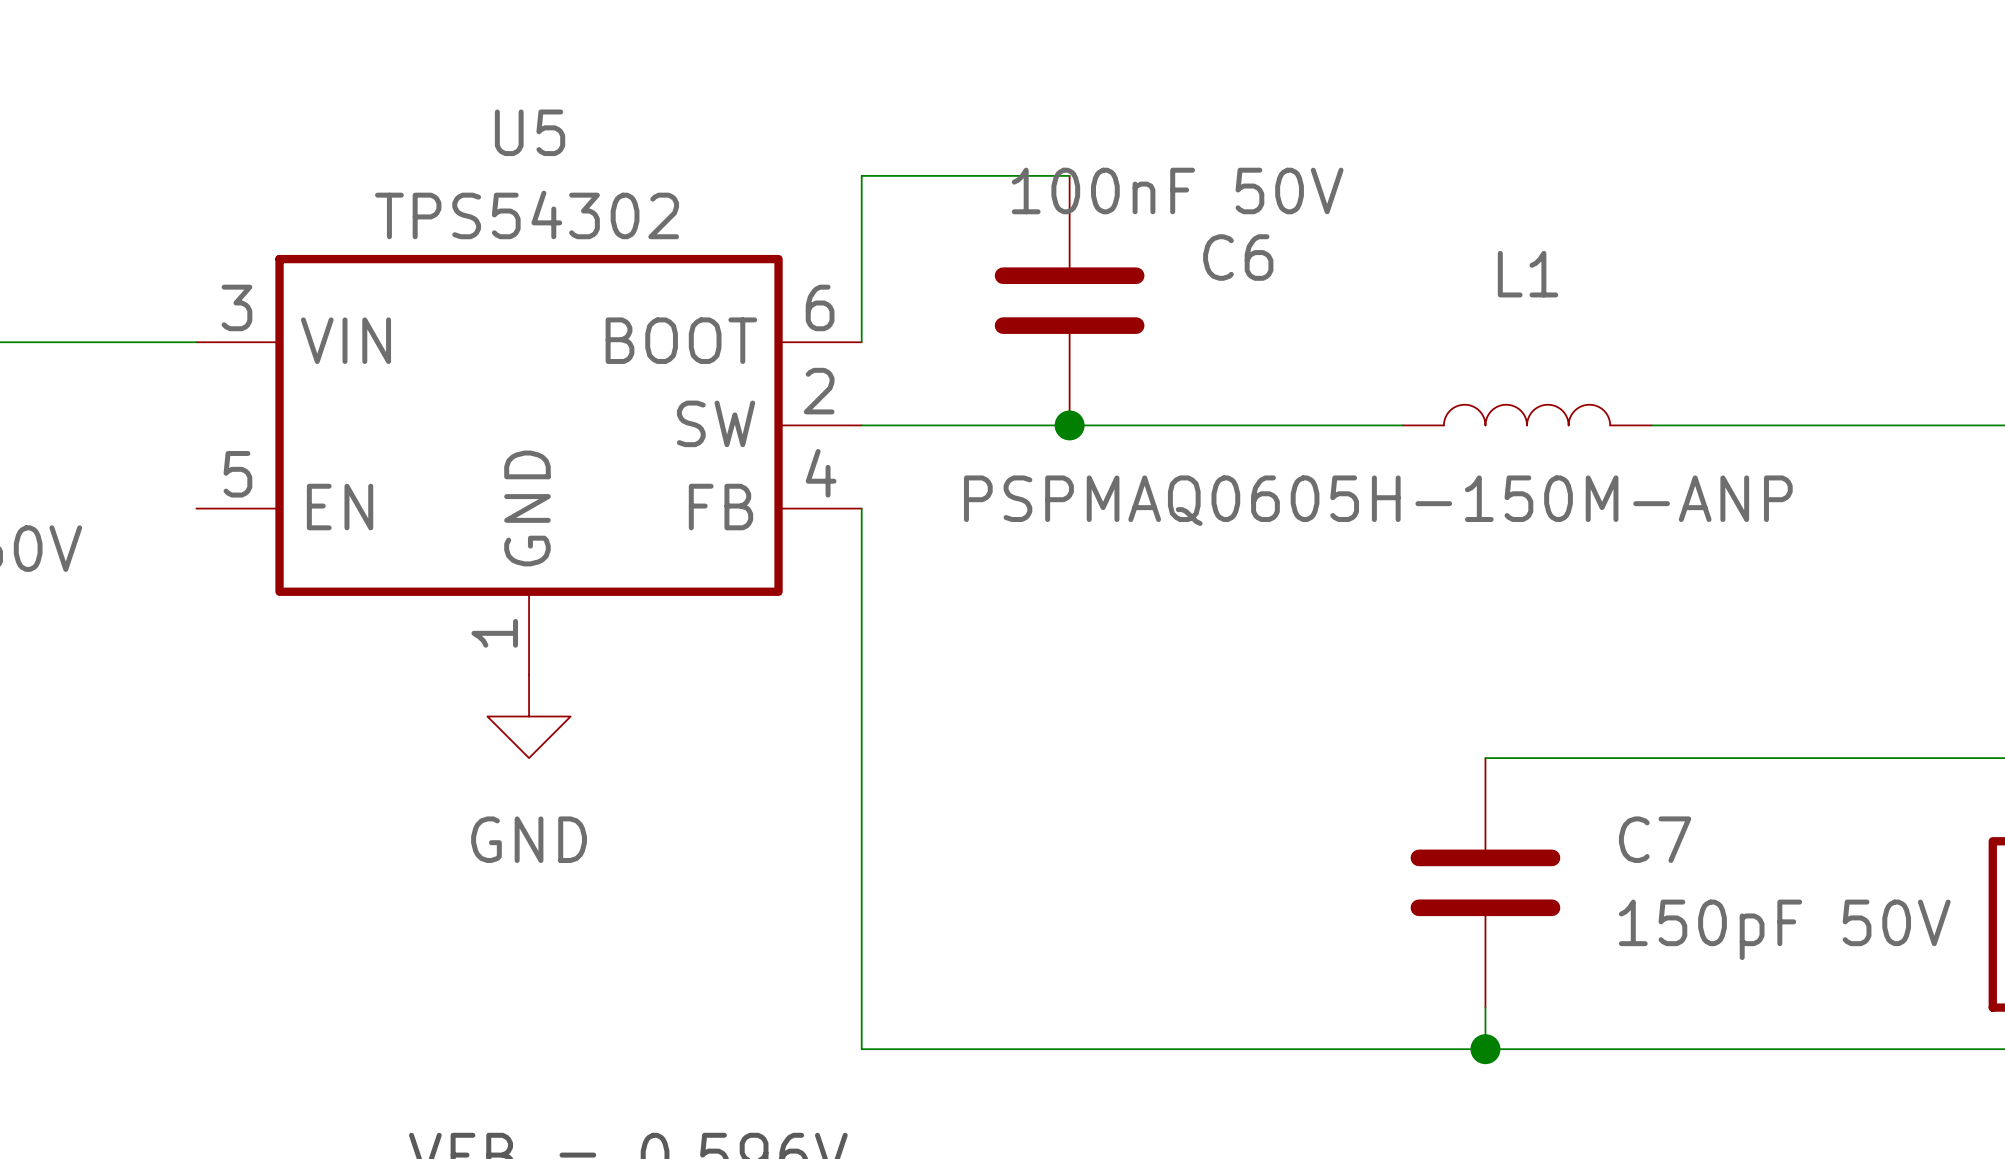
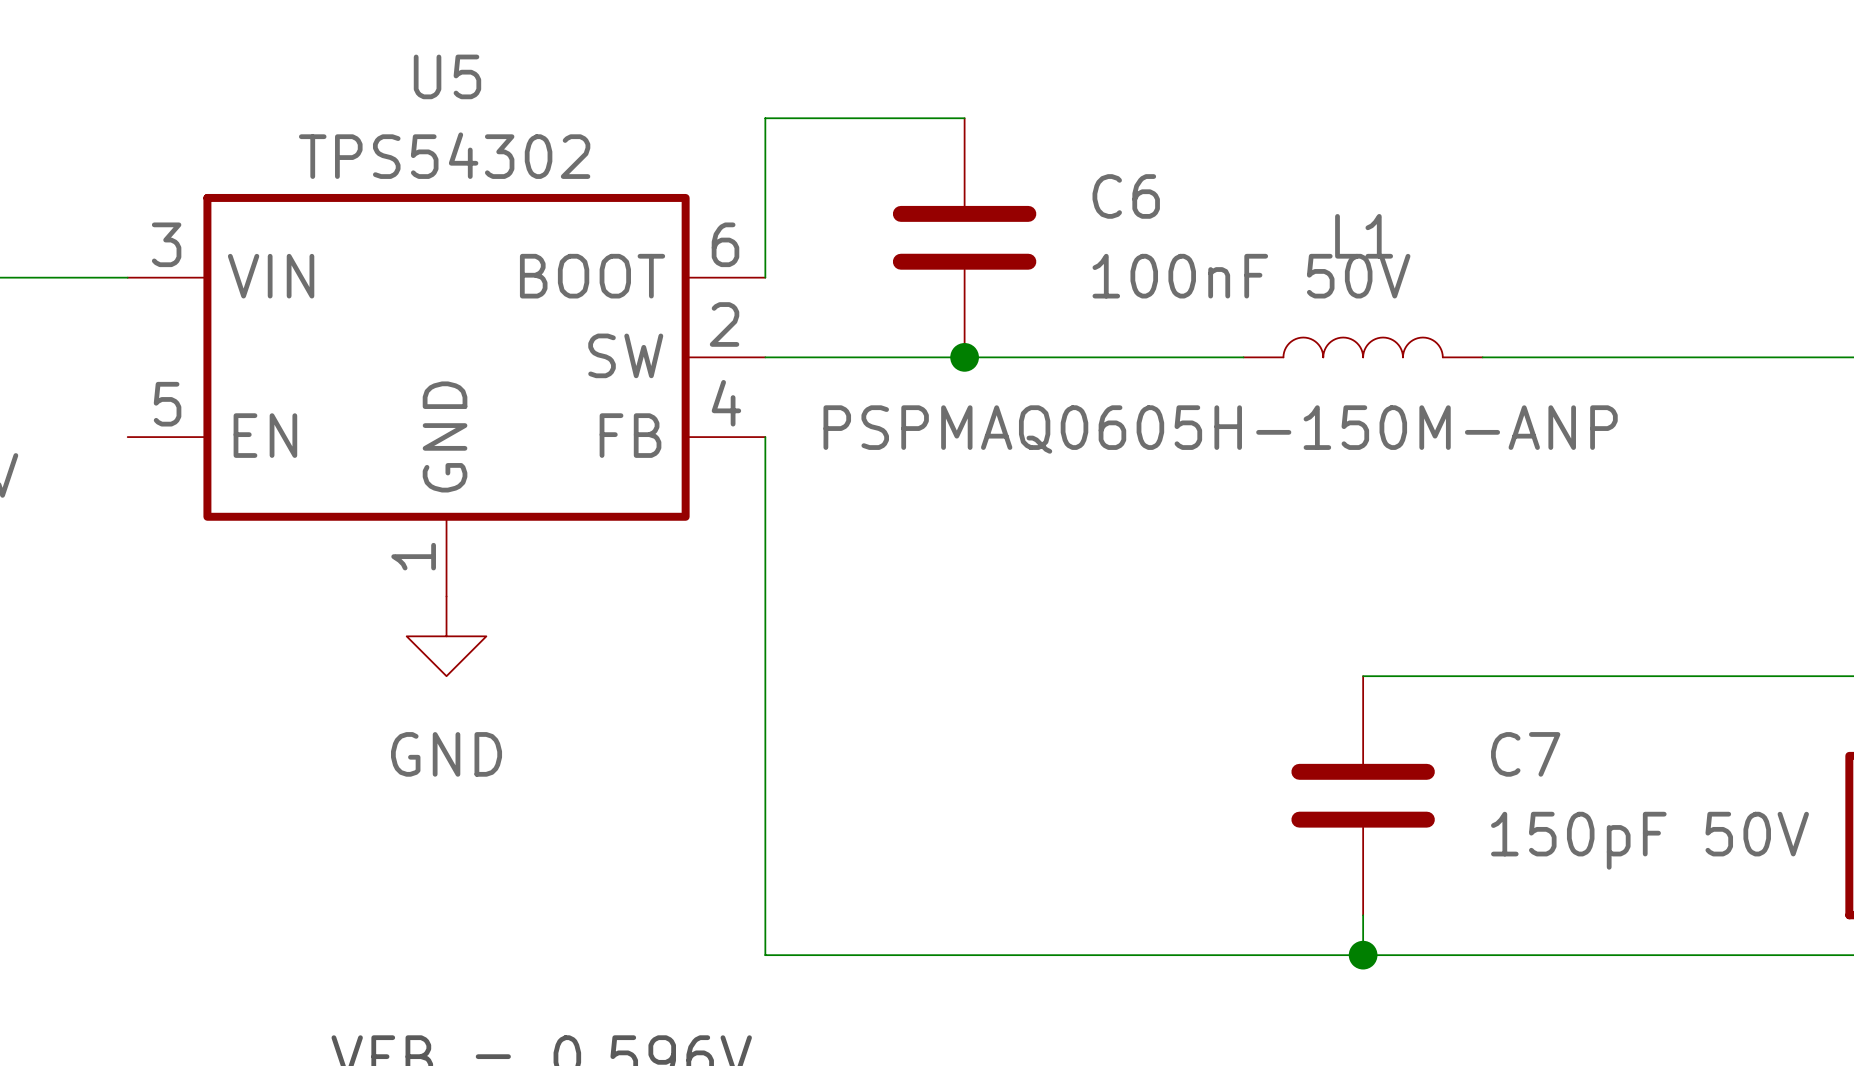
C6 value position: 100nF 50V (1177, 190) -> 100nF 50V (1251, 276)
L1 name position: L1 (1528, 274) -> L1 (1364, 236)
L1 position: (1527, 415) -> (1363, 347)

